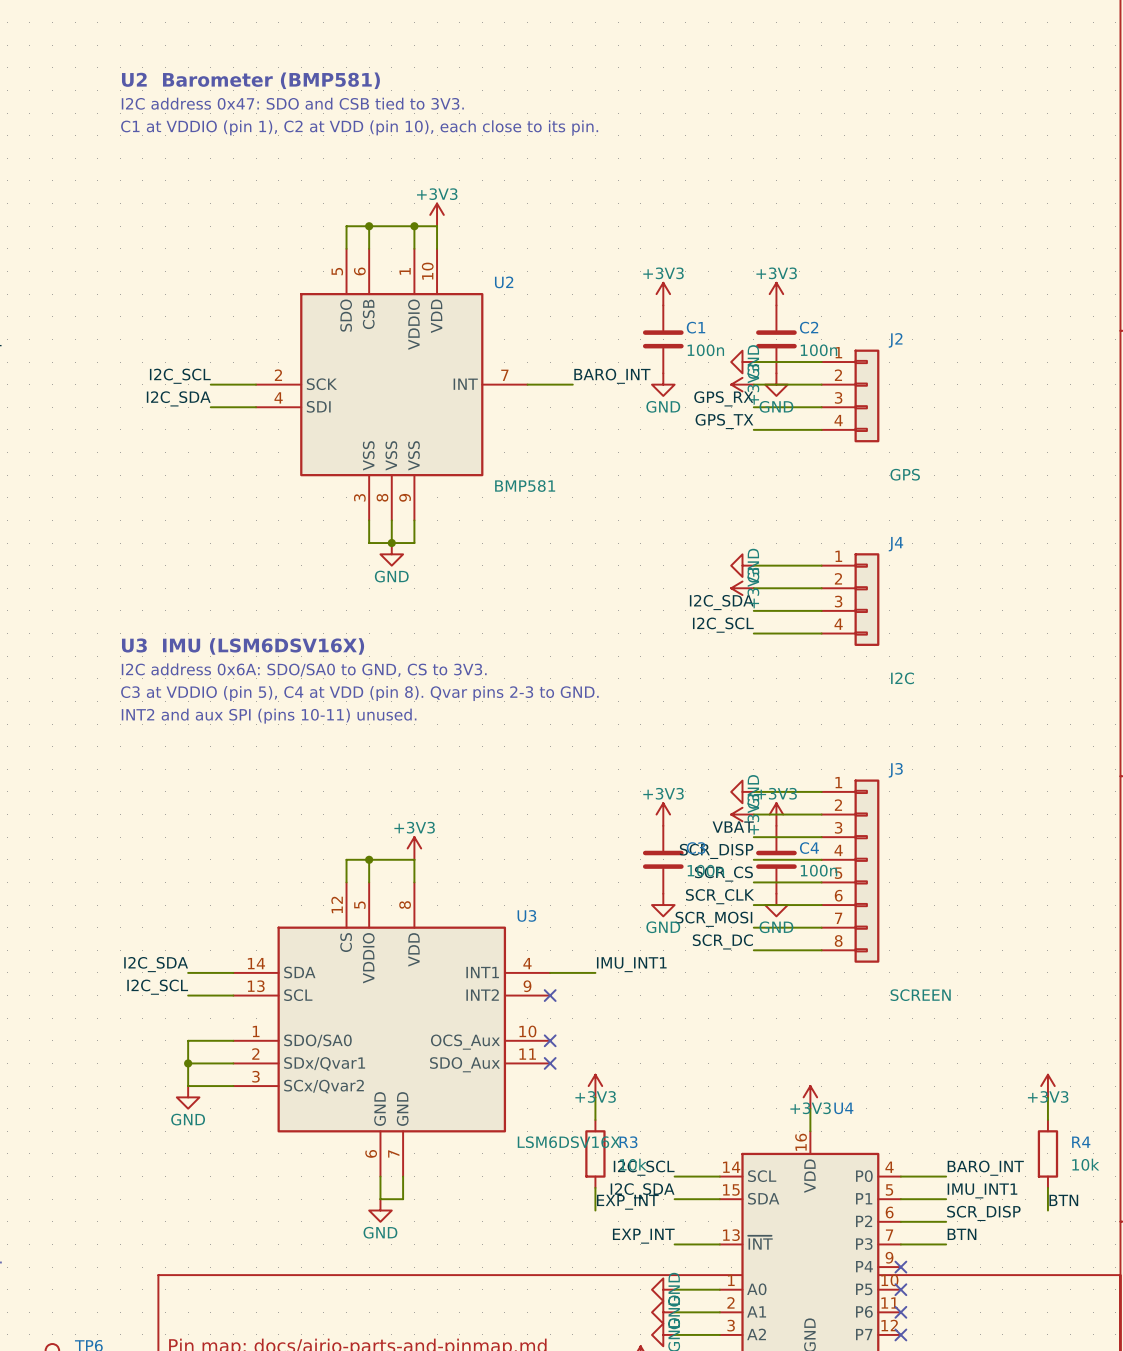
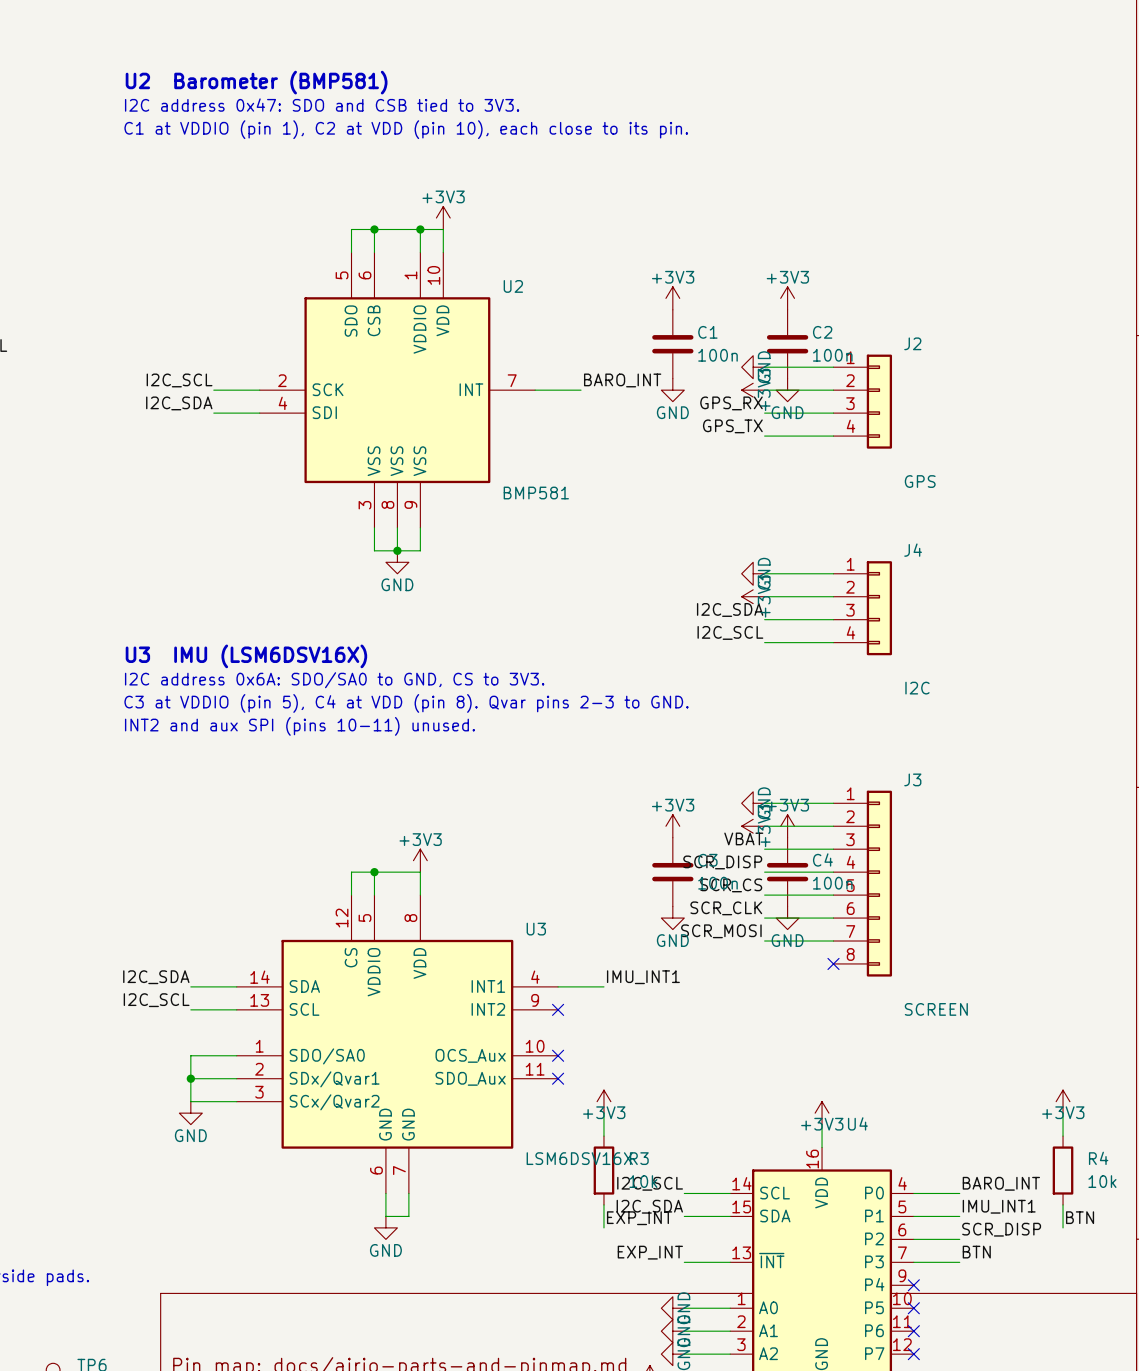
label: SCR_DC (722, 941) -> none
wire: (753, 950) (821, 950) -> none
no-connect mark: none -> (833, 963)

